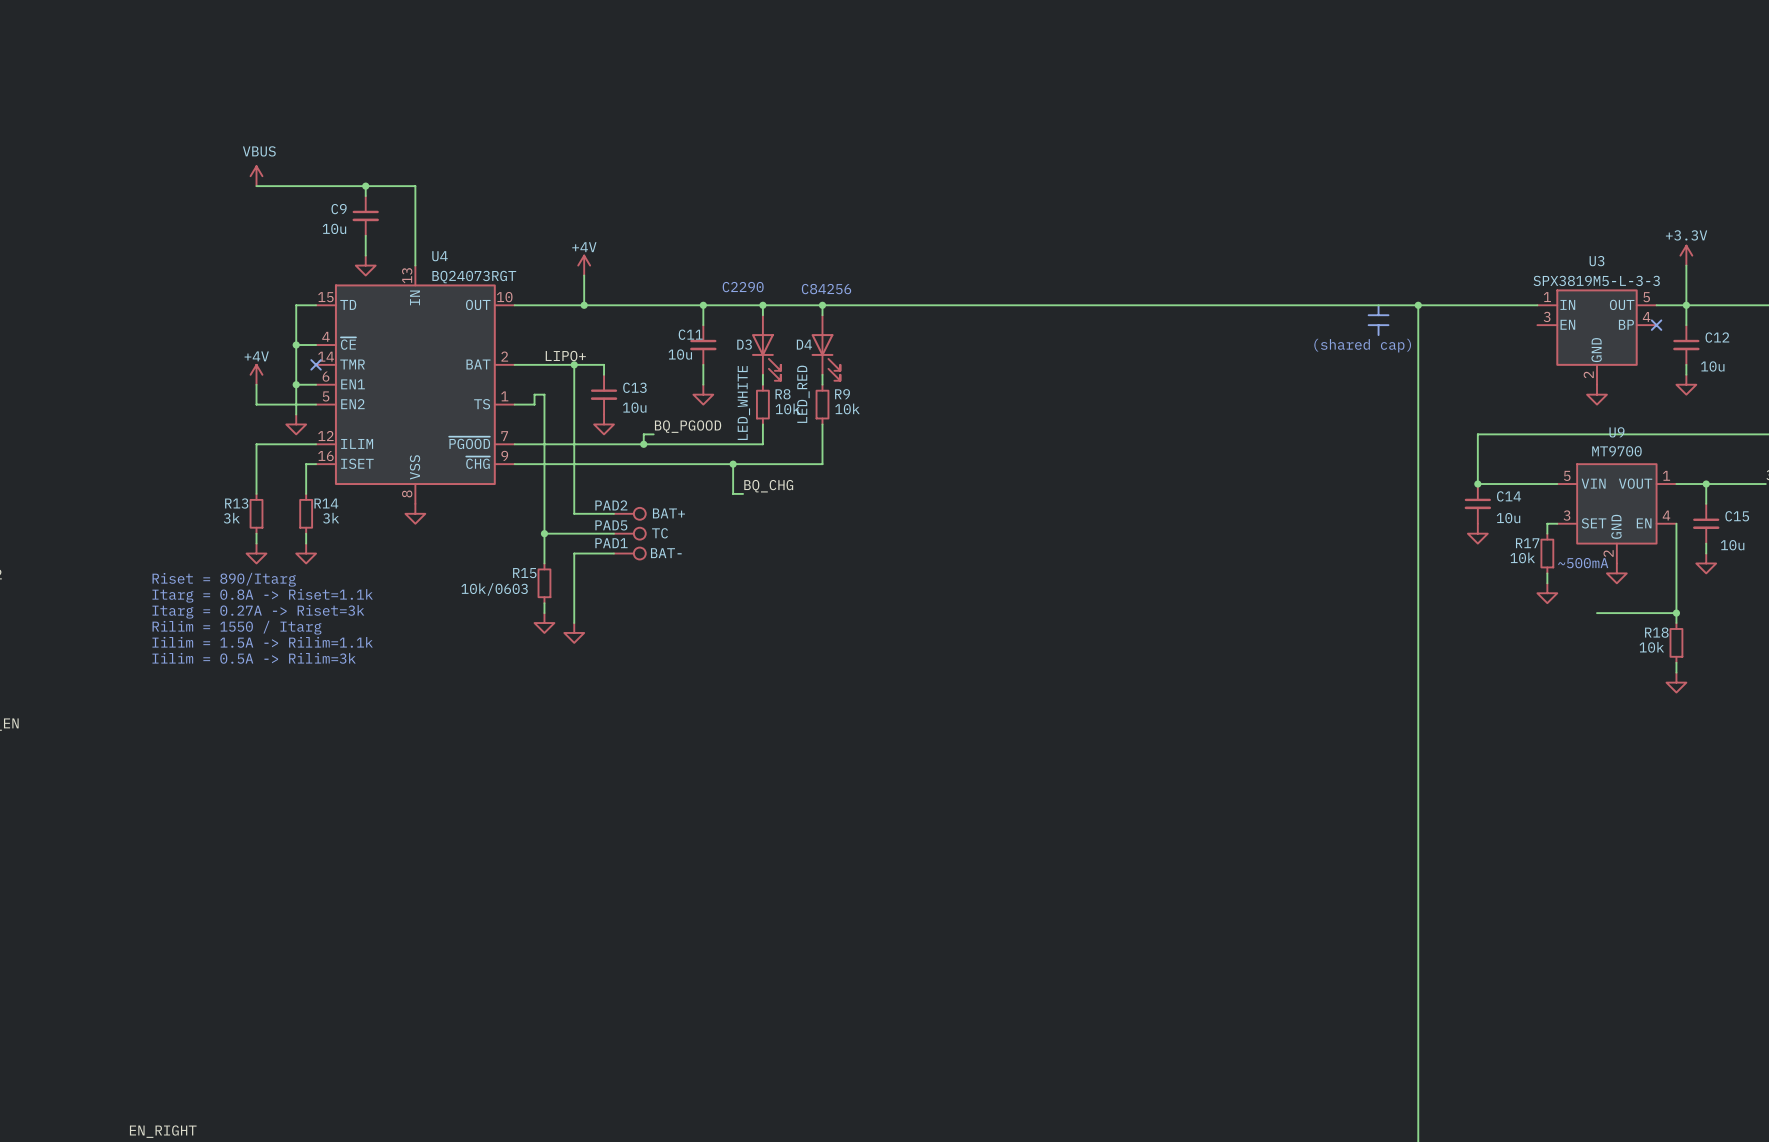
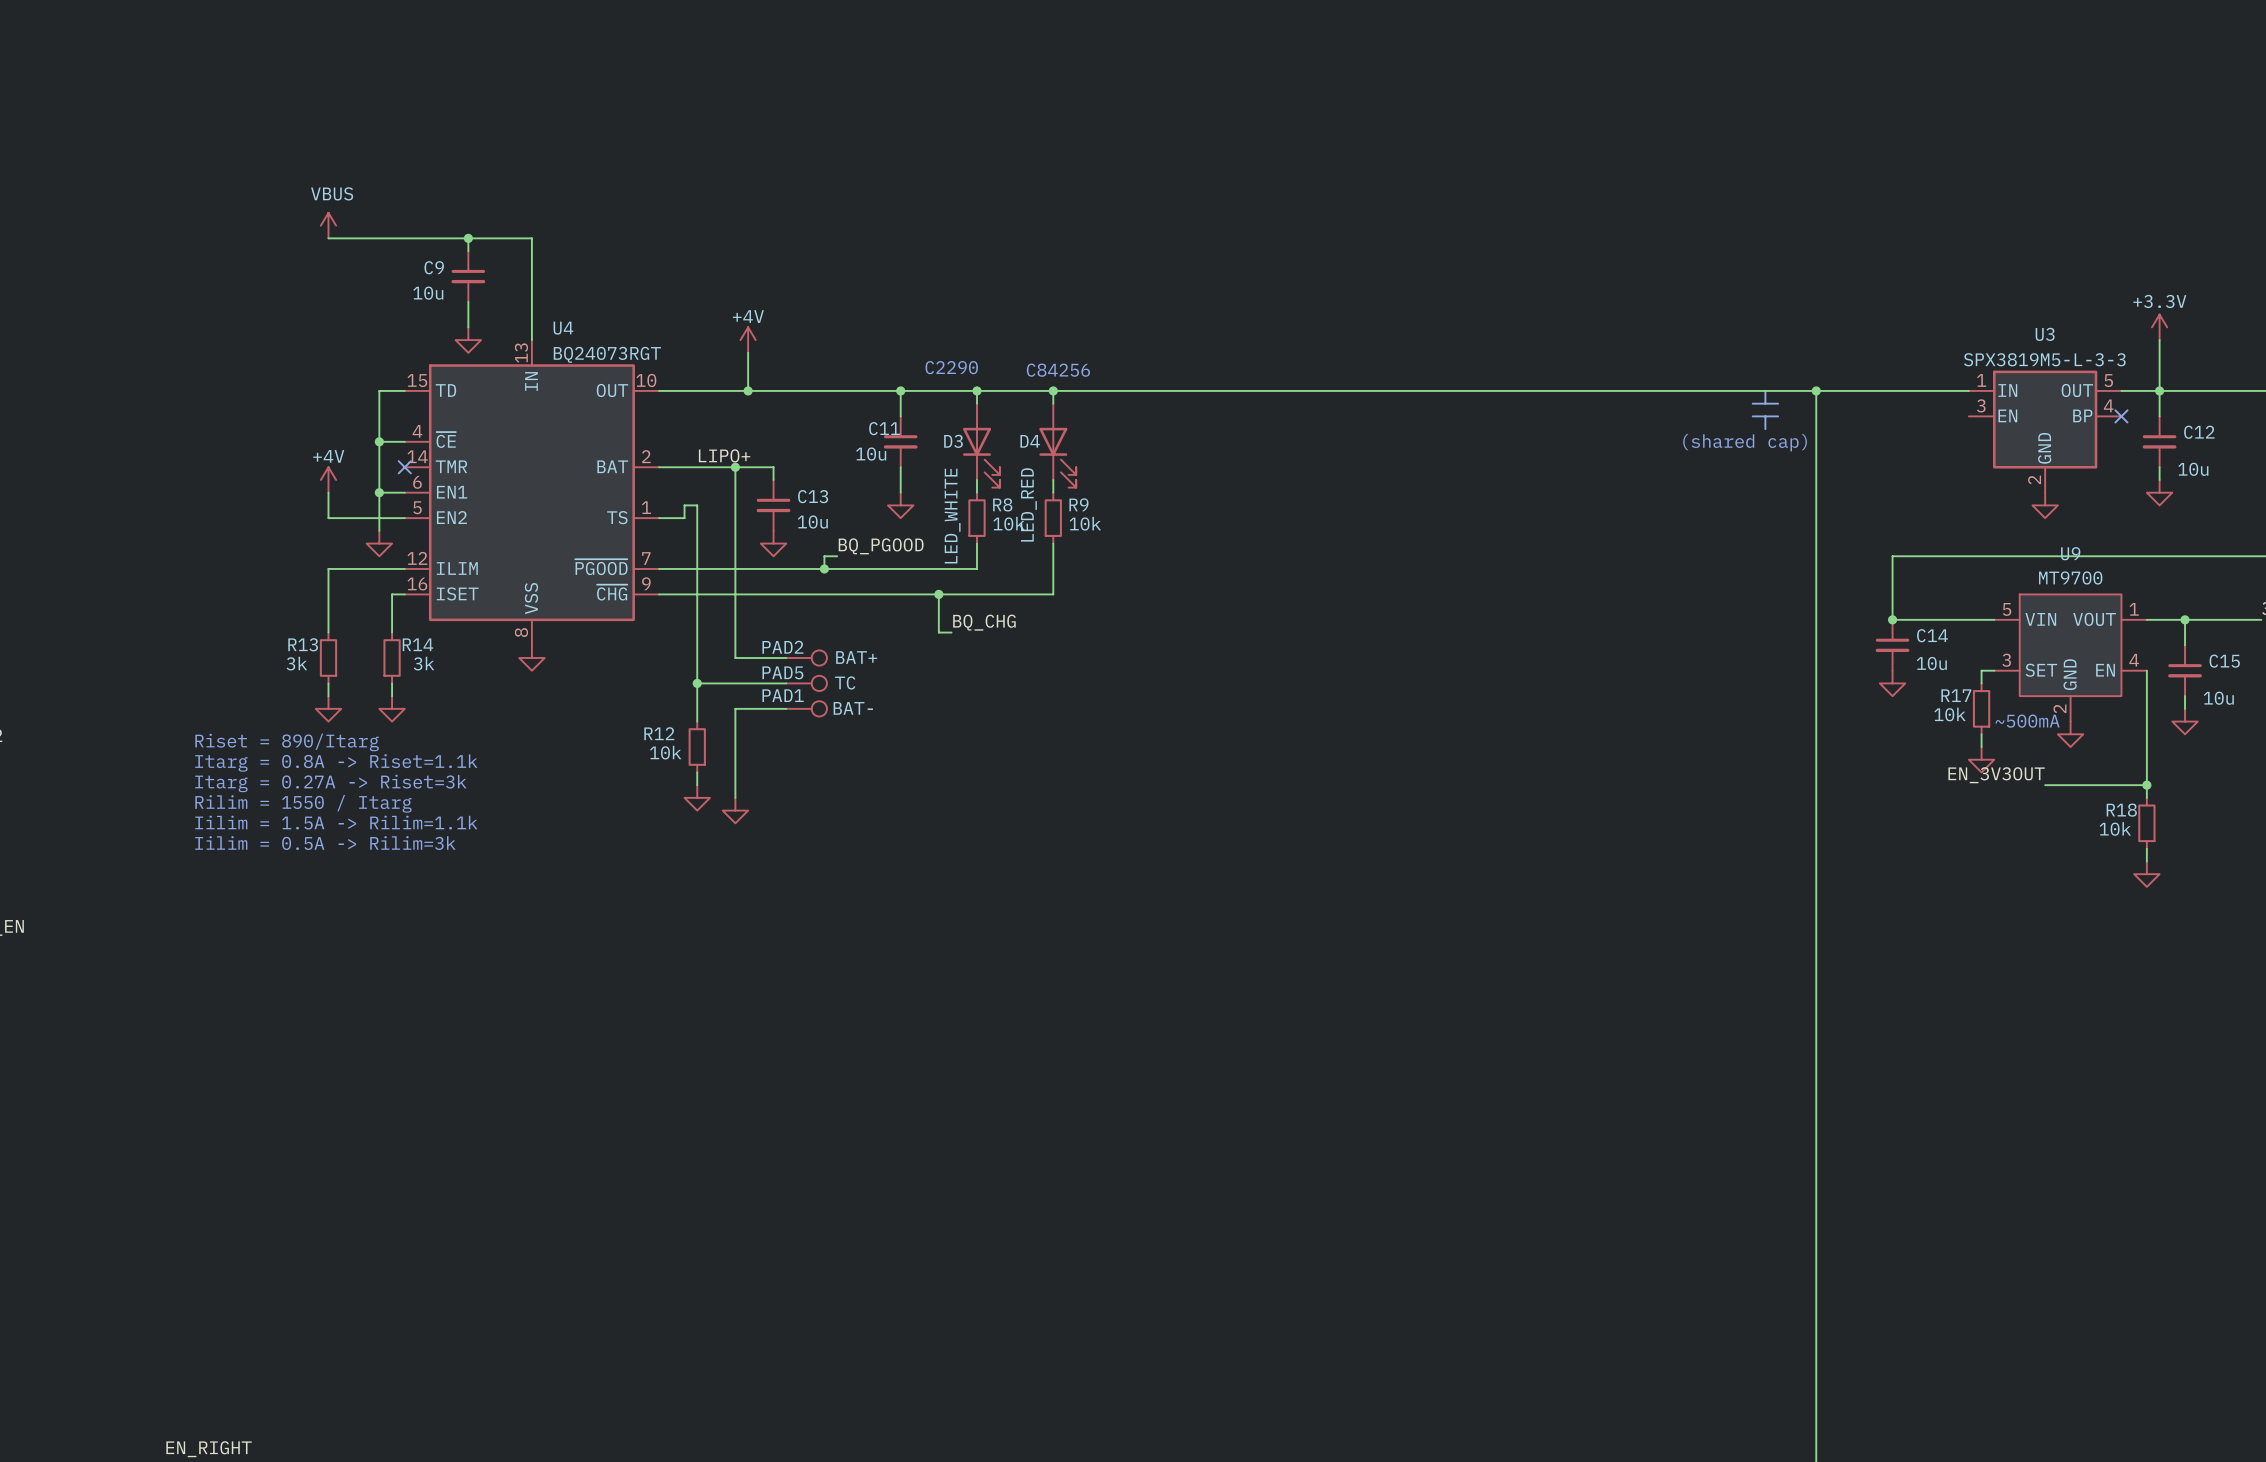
R15 name: R15 (524, 573) -> R12 (659, 733)
R15 value: 10k/0603 (494, 589) -> 10k (665, 752)
label: none -> EN_3V3OUT (1996, 775)

